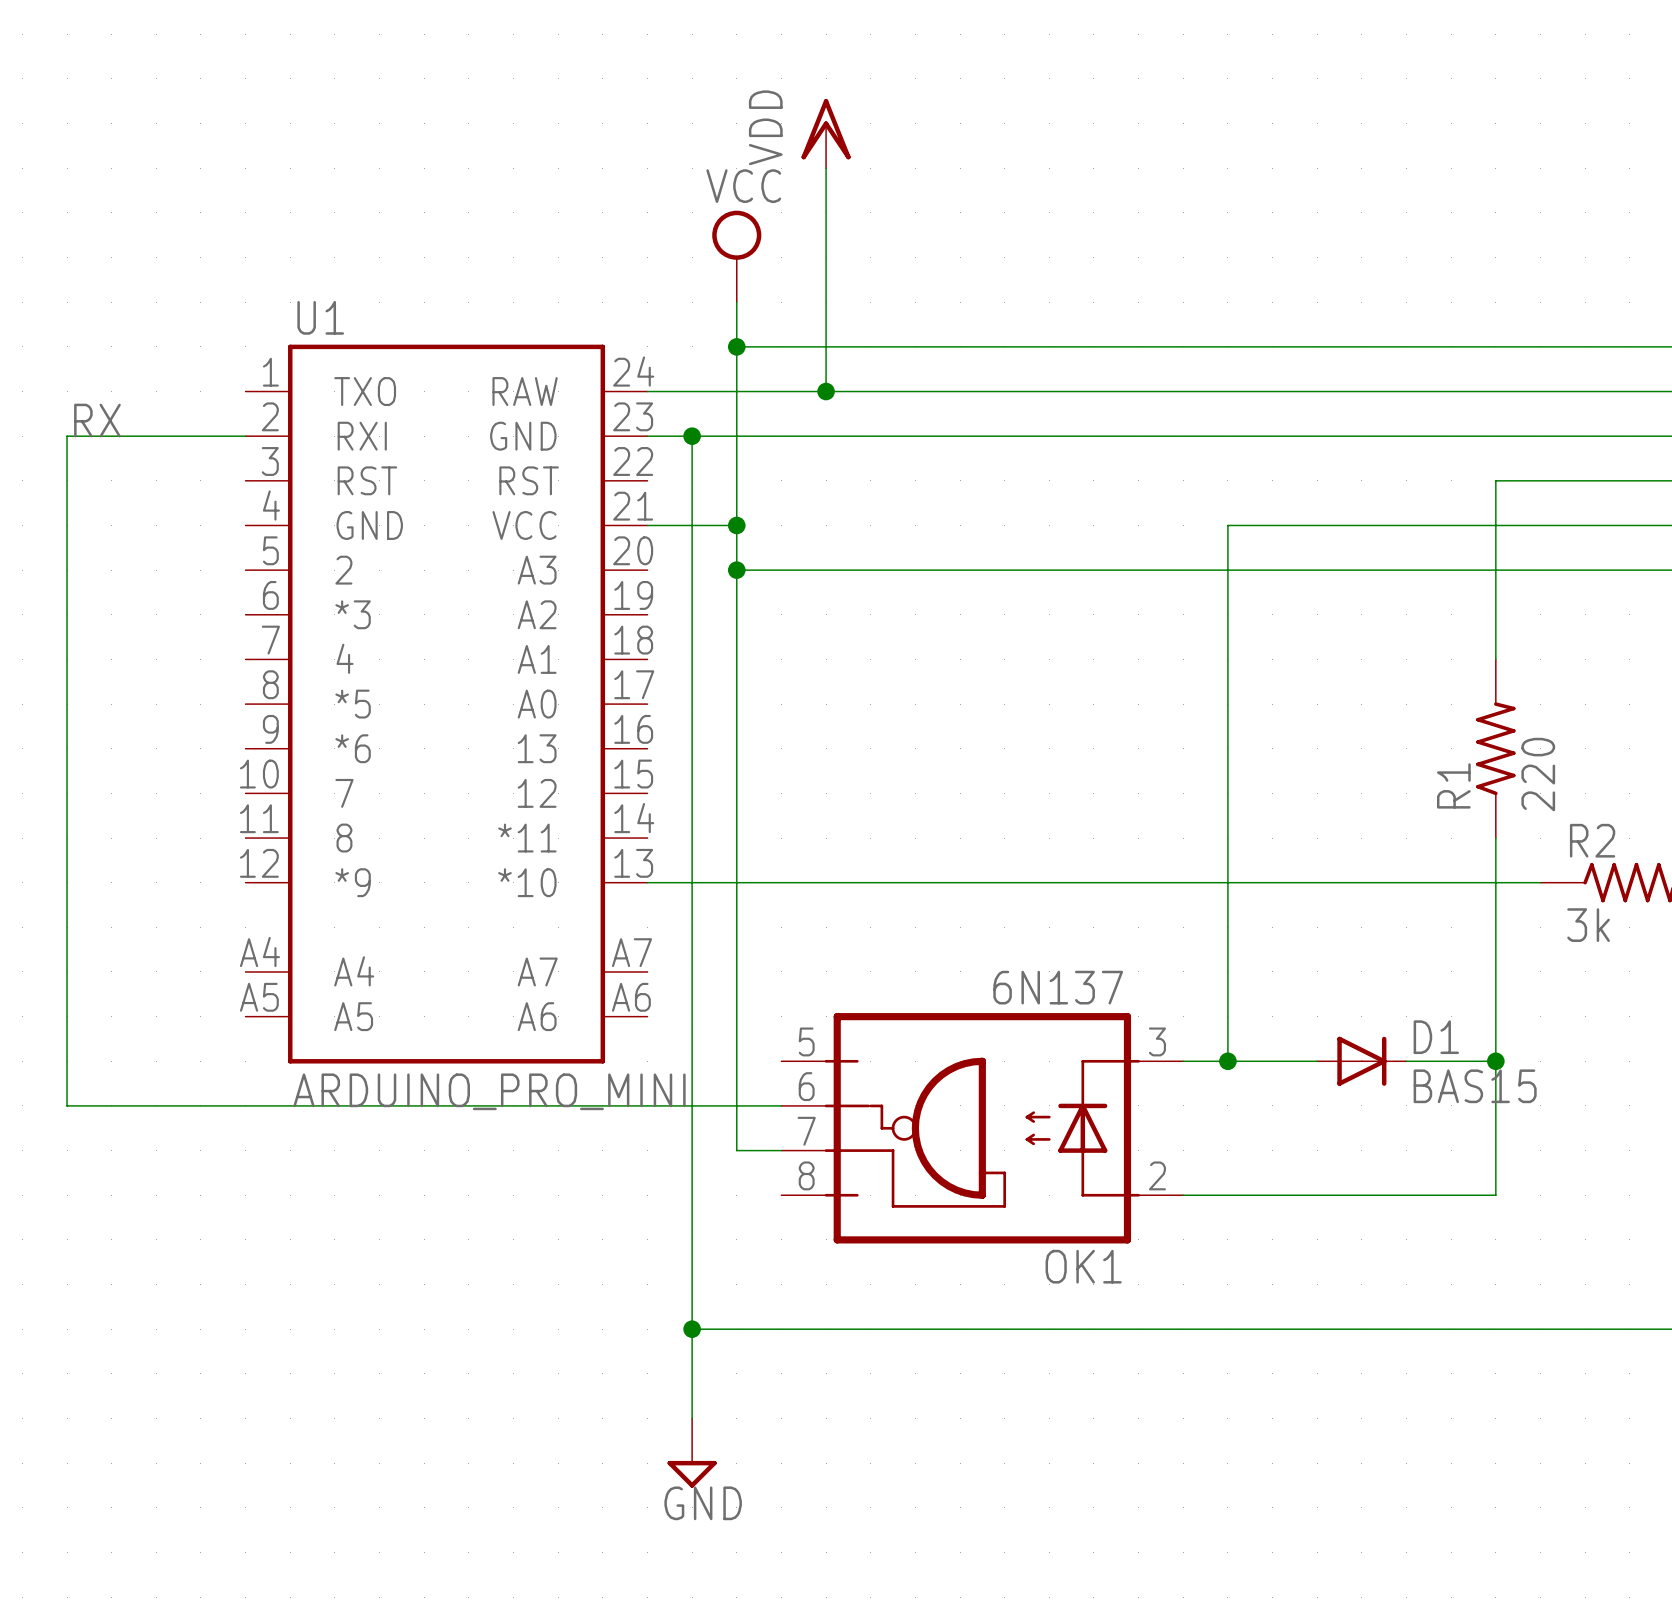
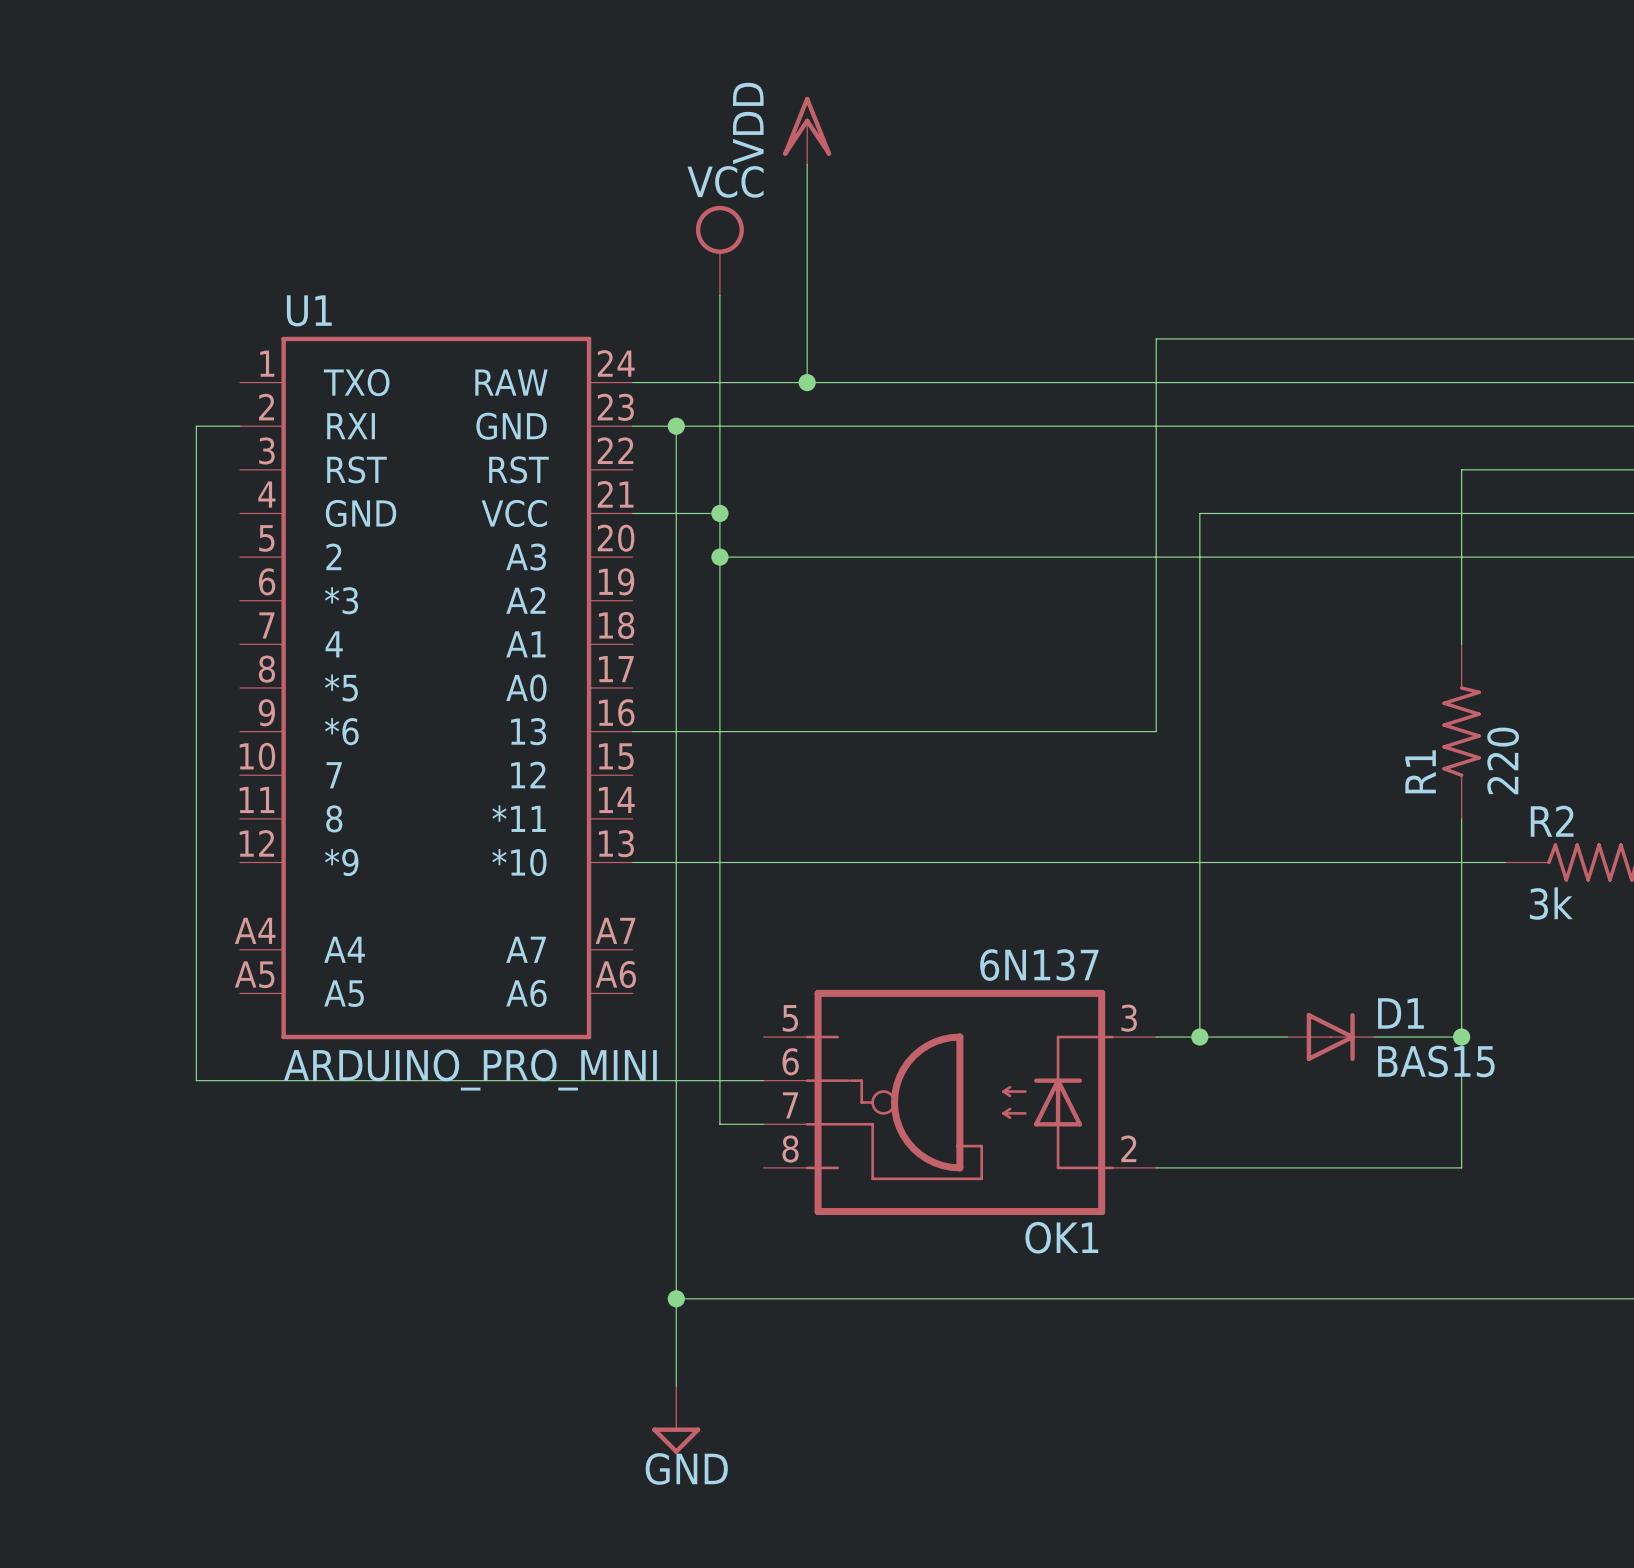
wire: (736, 346) (1183, 346) -> (632, 731) (1156, 731) (1156, 338)
junction: (736, 346) -> none
label: RX (97, 420) -> none
wire: (200, 436) (67, 436) (67, 1105) (200, 1105) -> (196, 426) (196, 1080)

